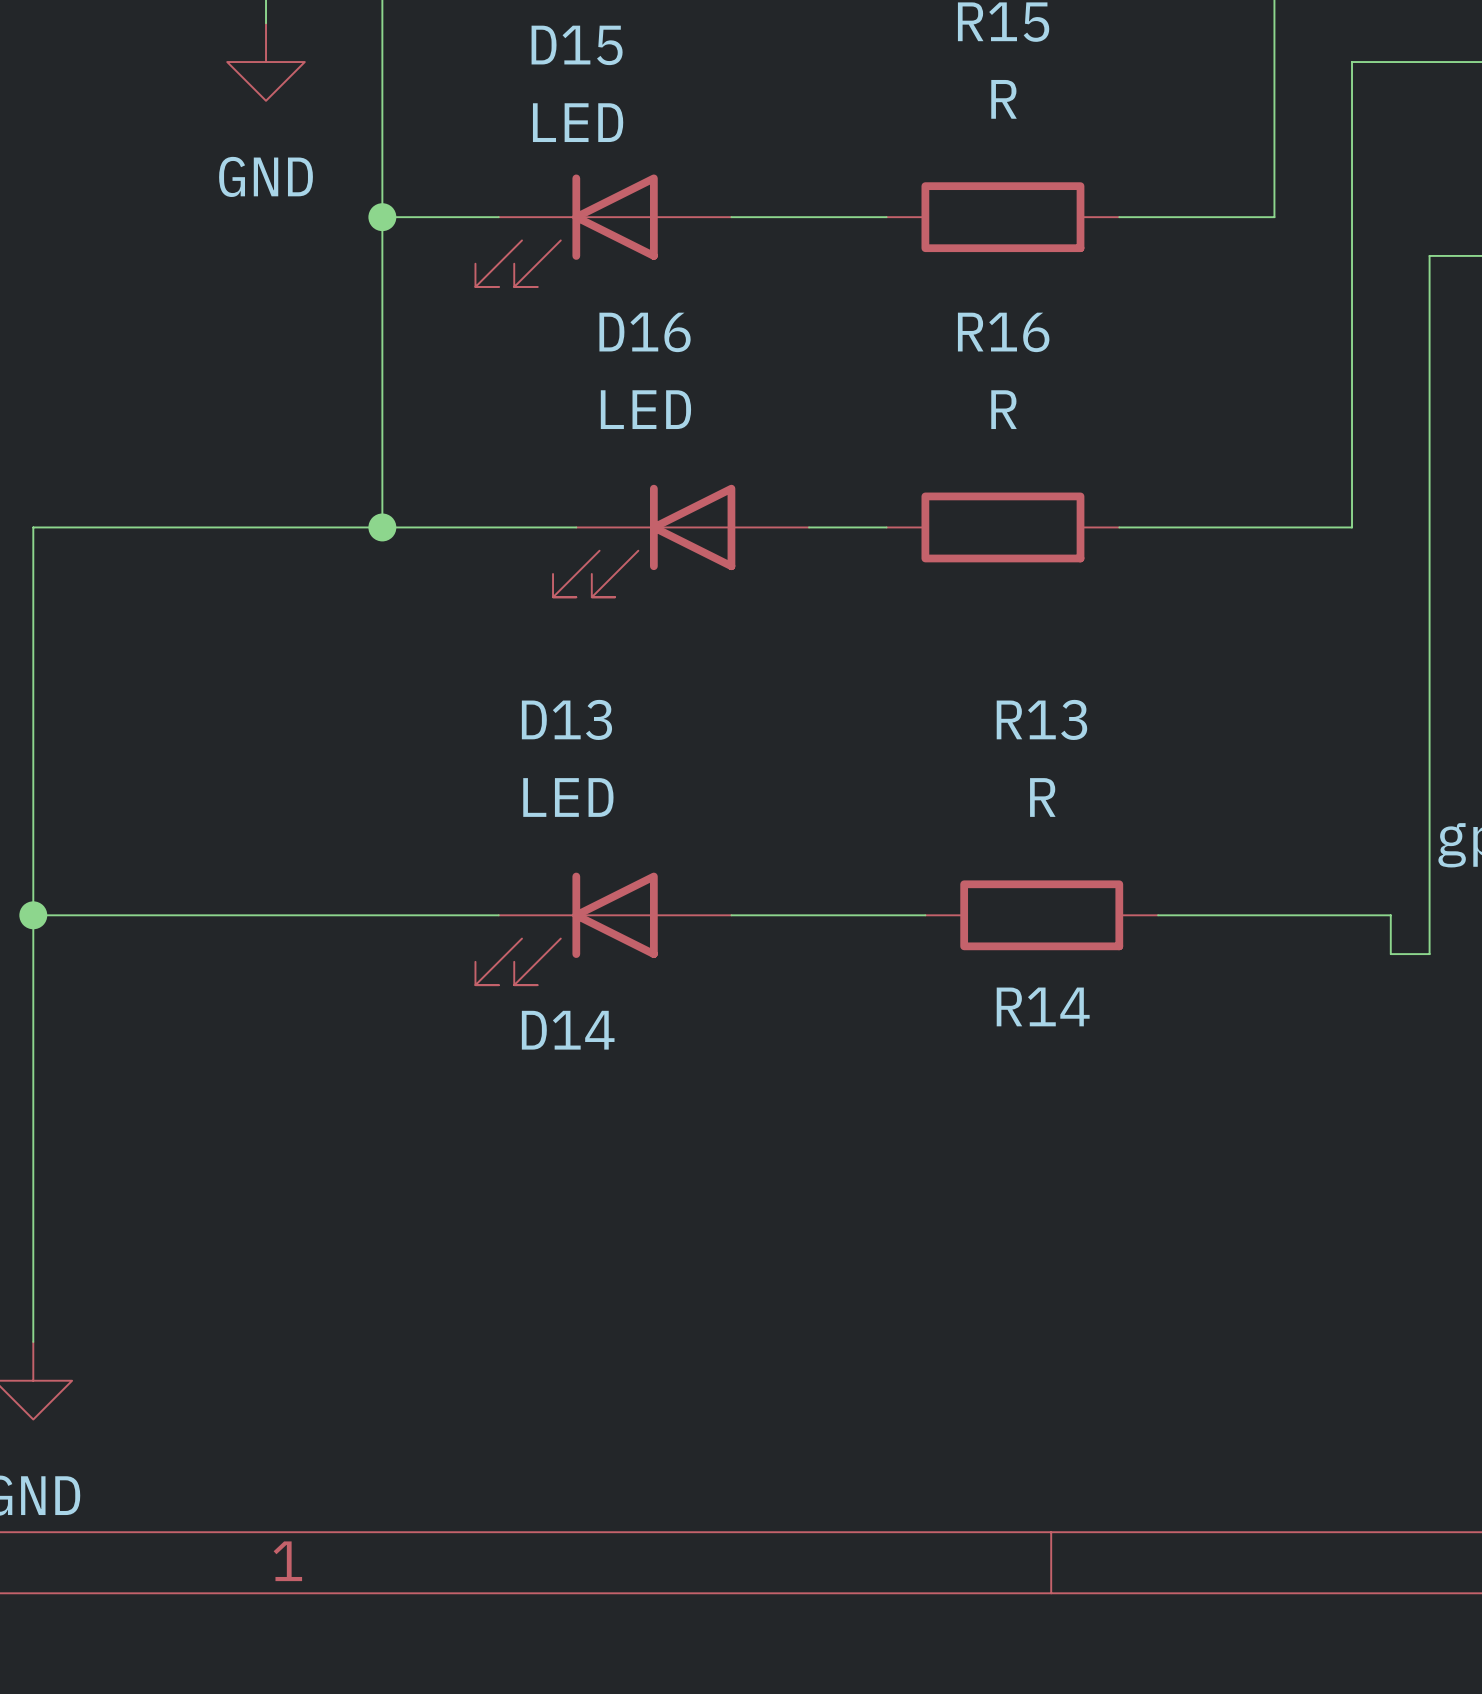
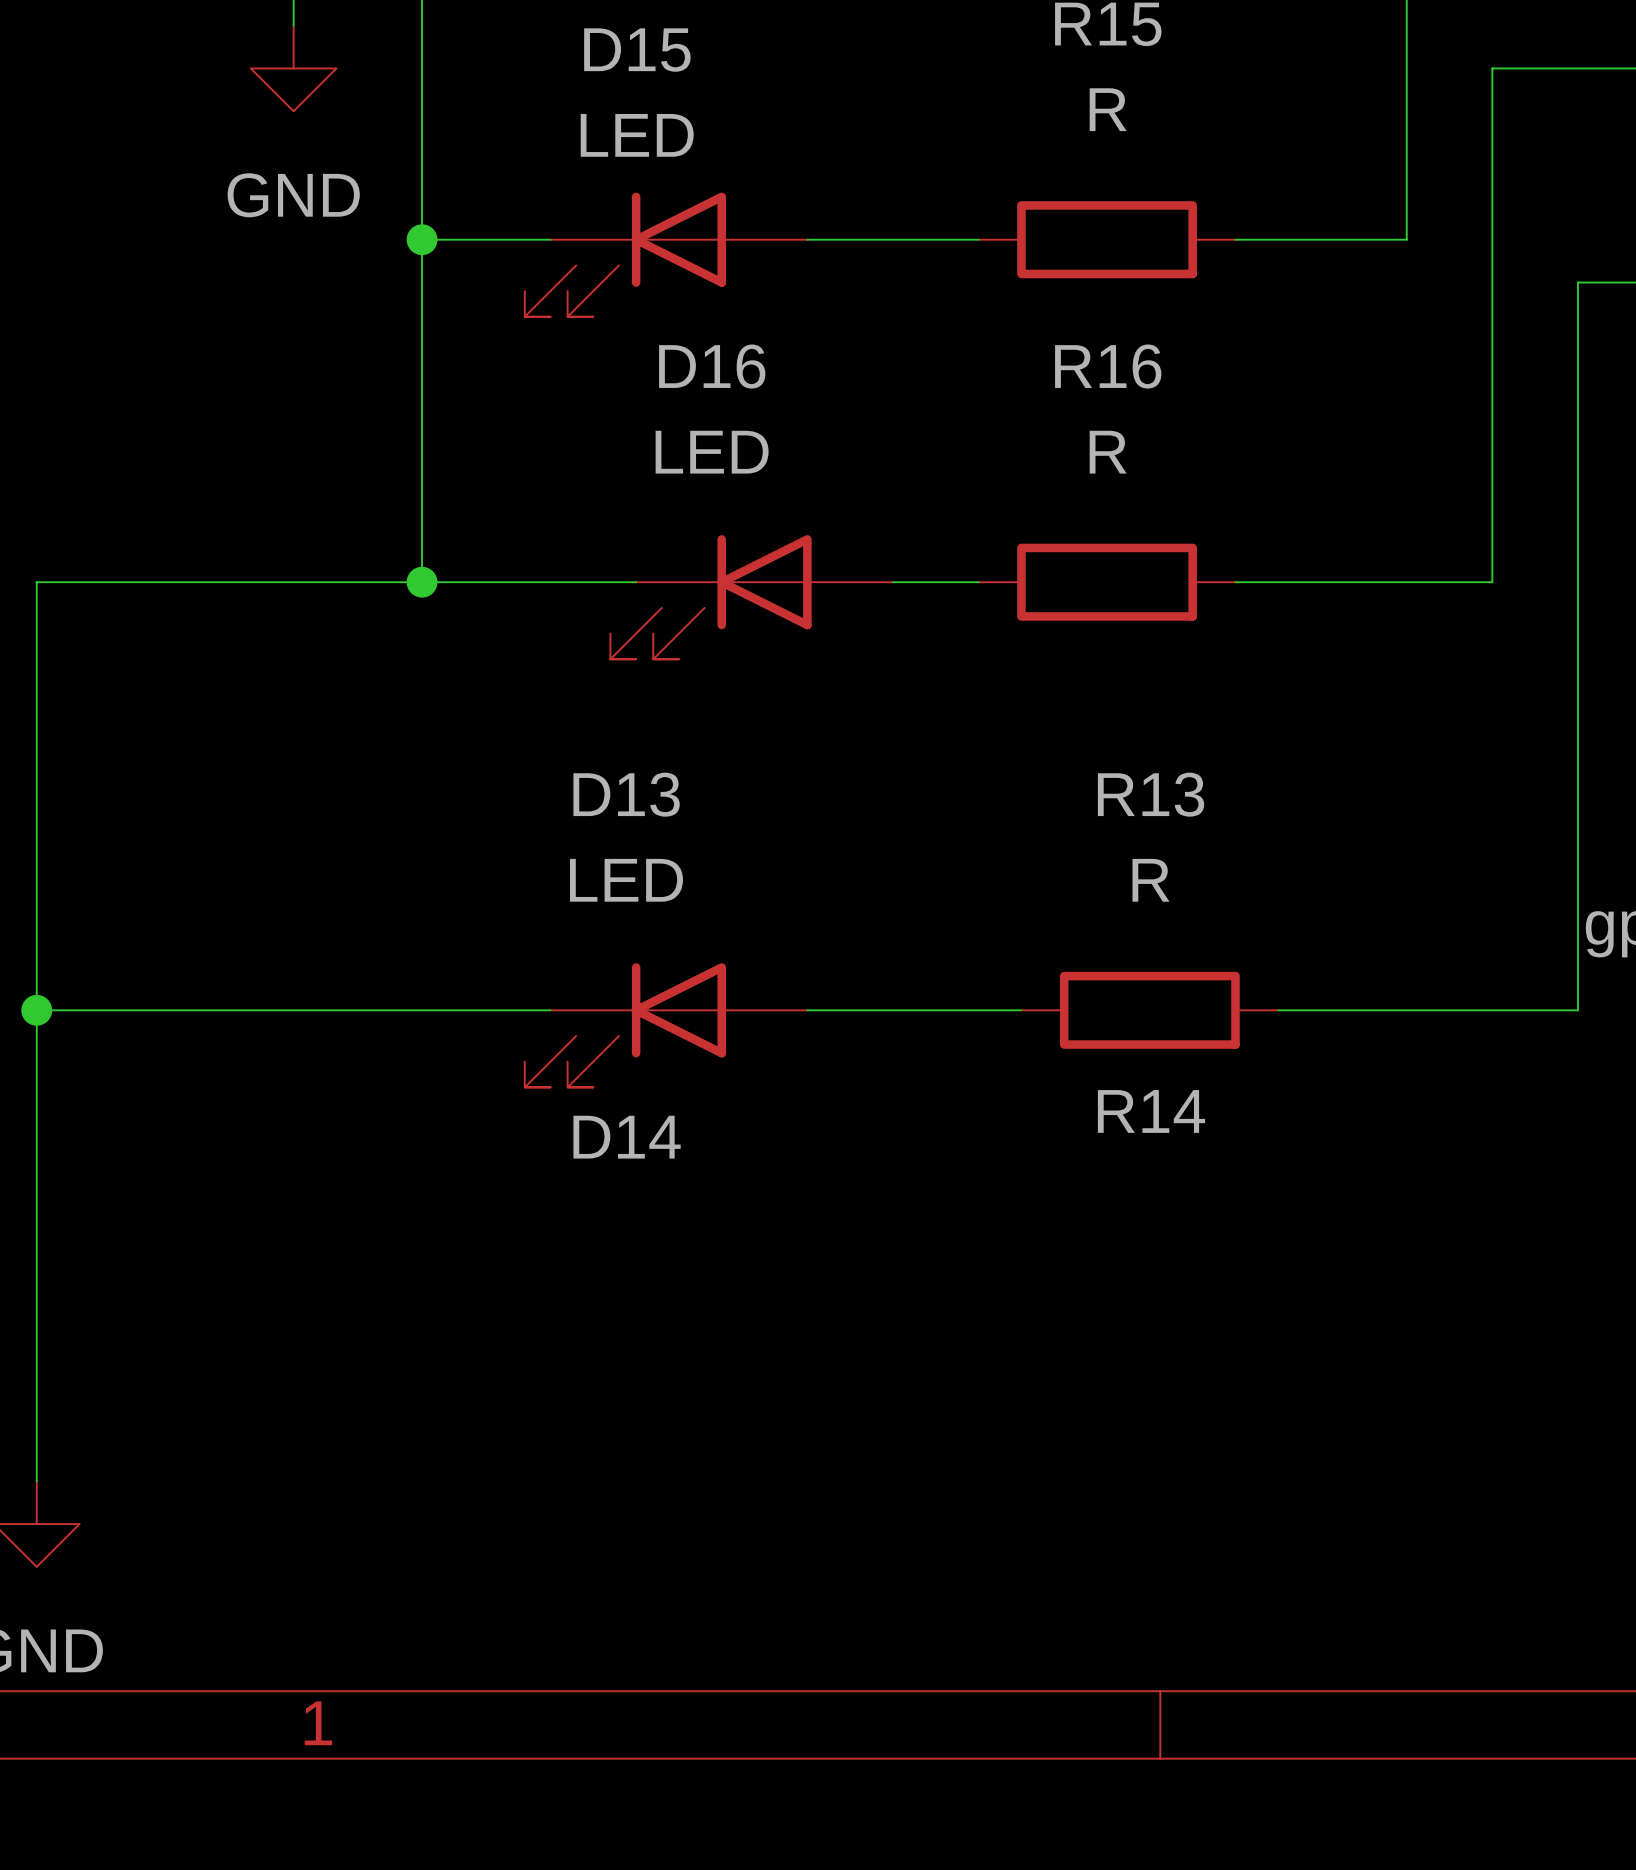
wire: (1390, 915) (1390, 954) (1429, 954) (1429, 915) -> (1535, 1010) (1577, 1010)

